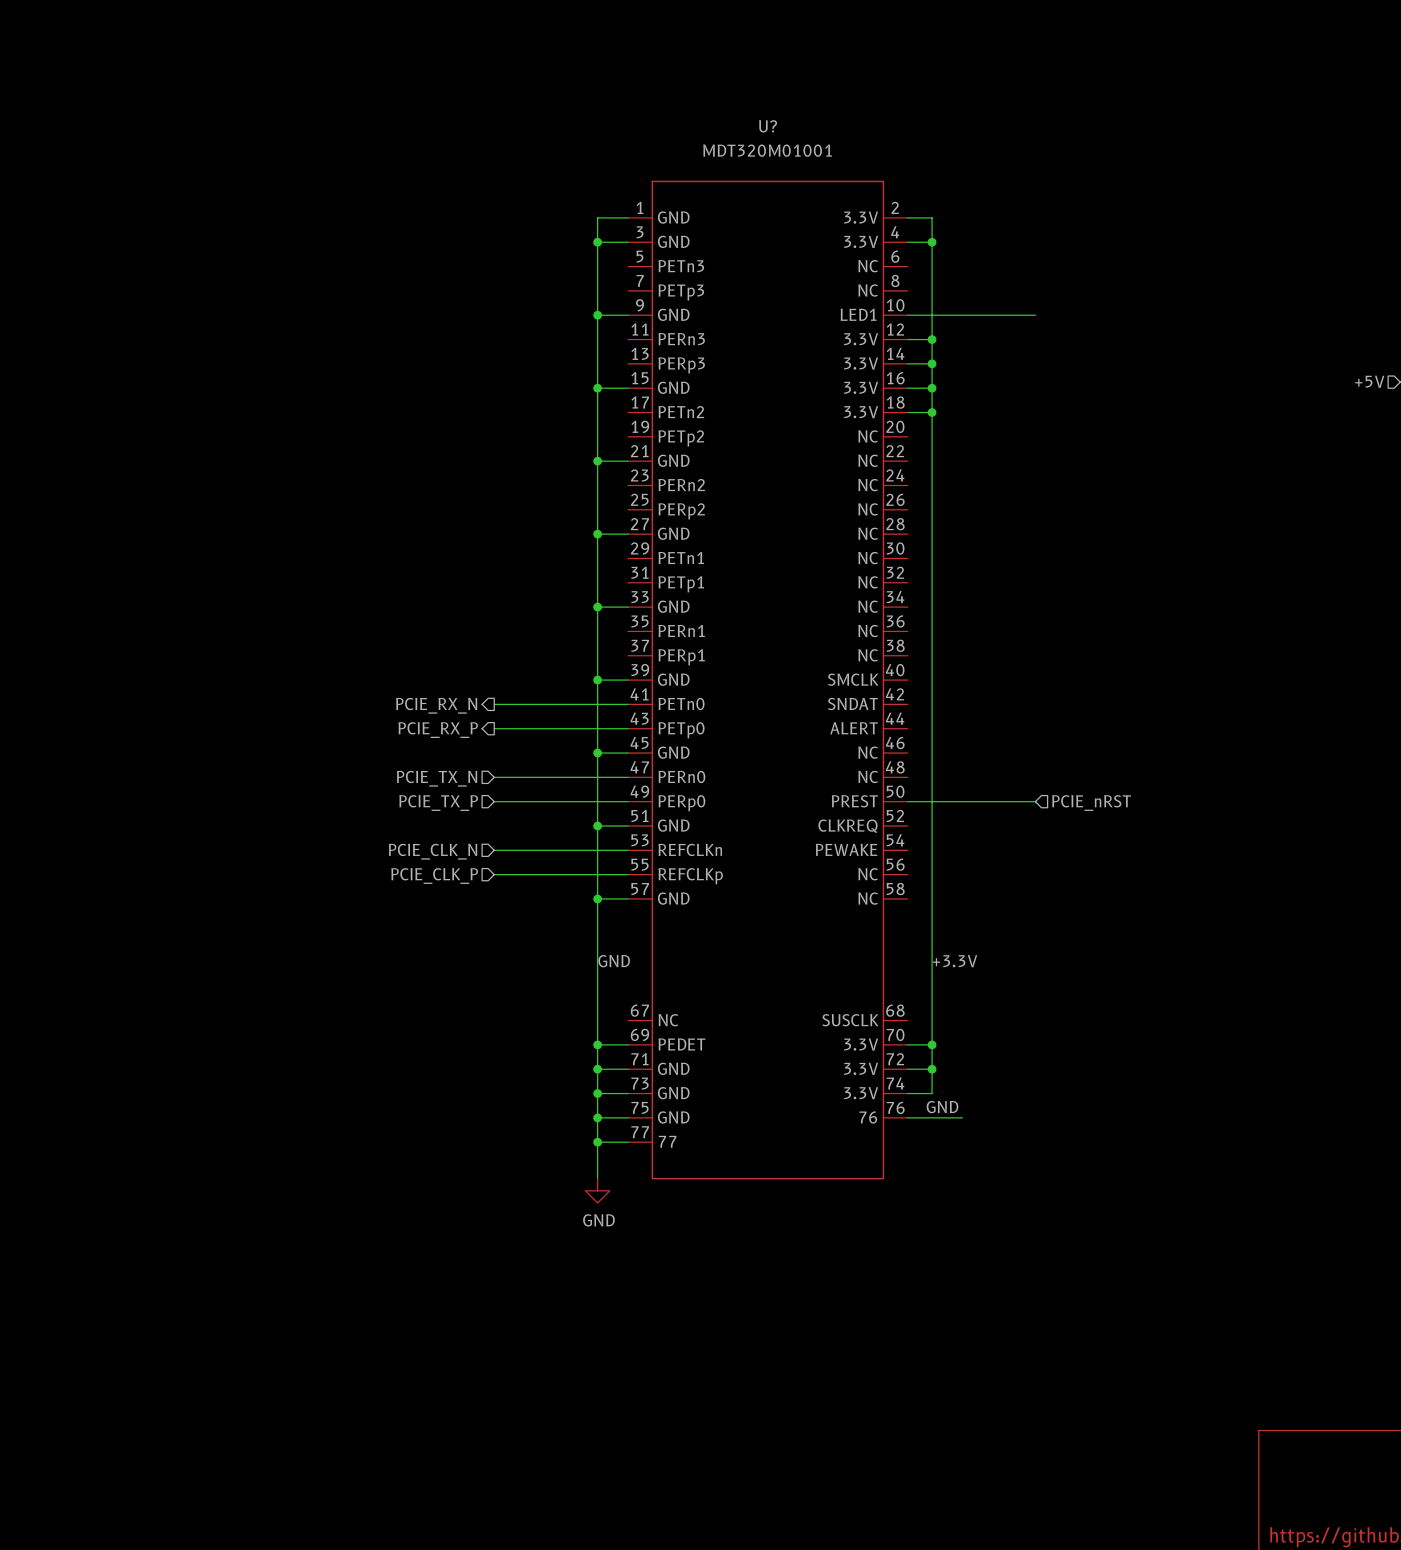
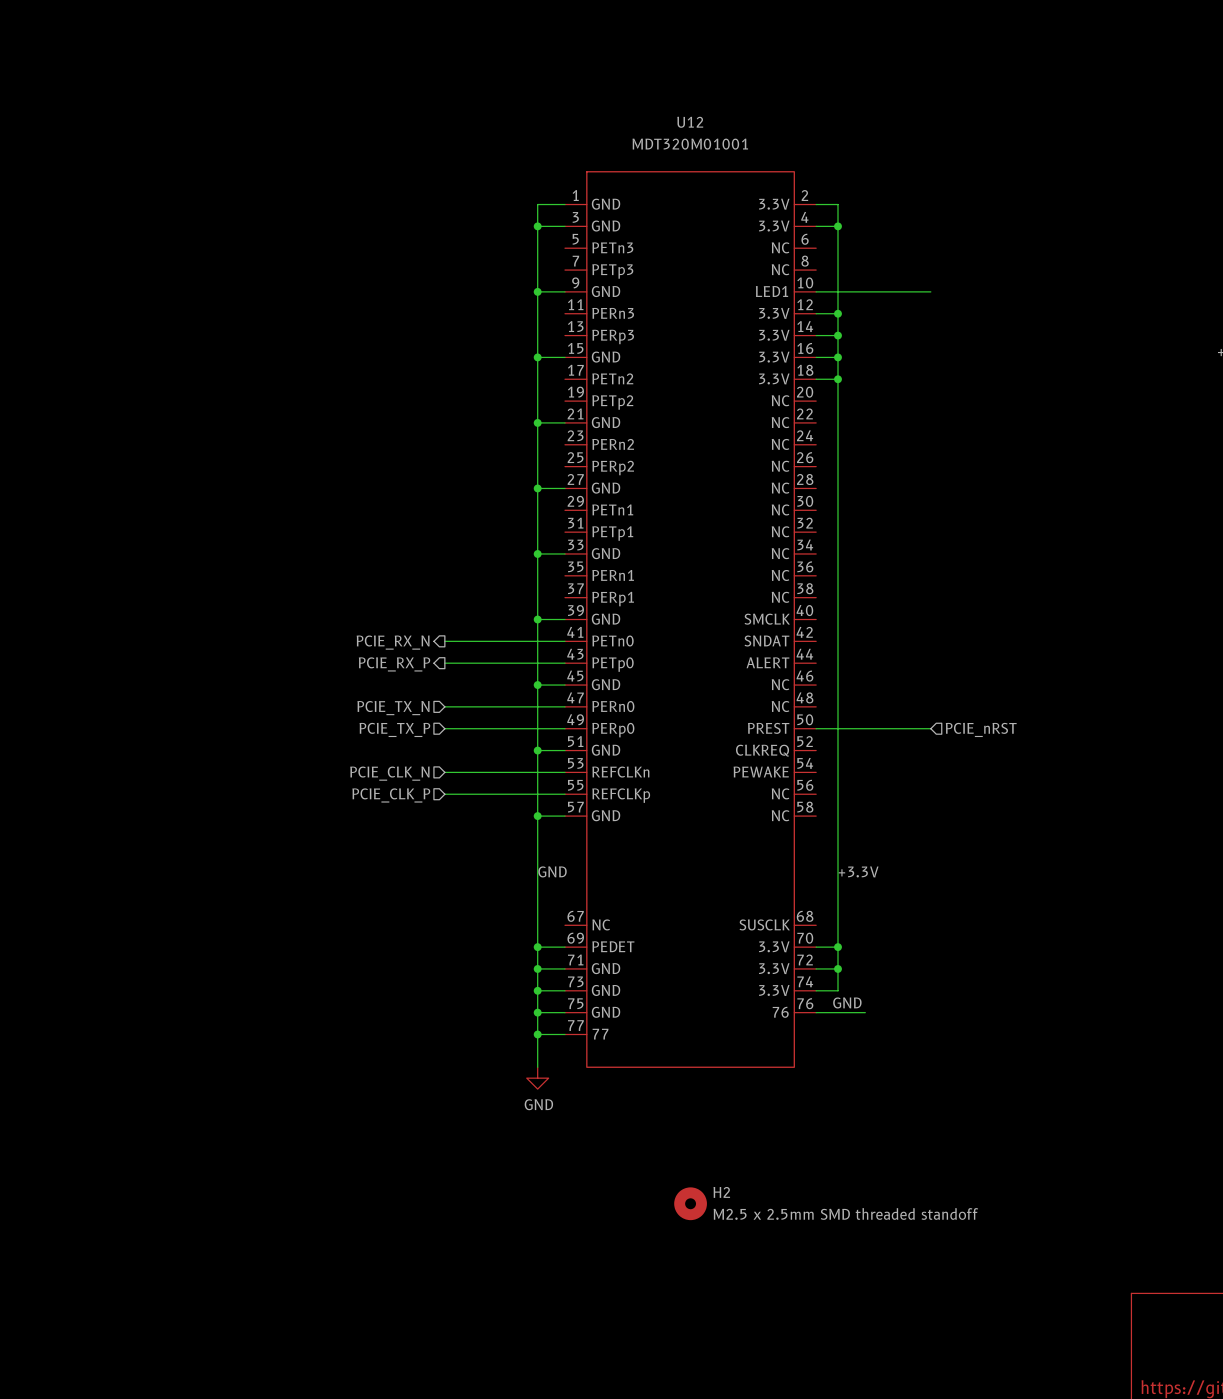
U? name: U? (768, 126) -> U12 (690, 122)
H2: none -> M2.5 x 2.5mm SMD threaded standoff (690, 1203)

